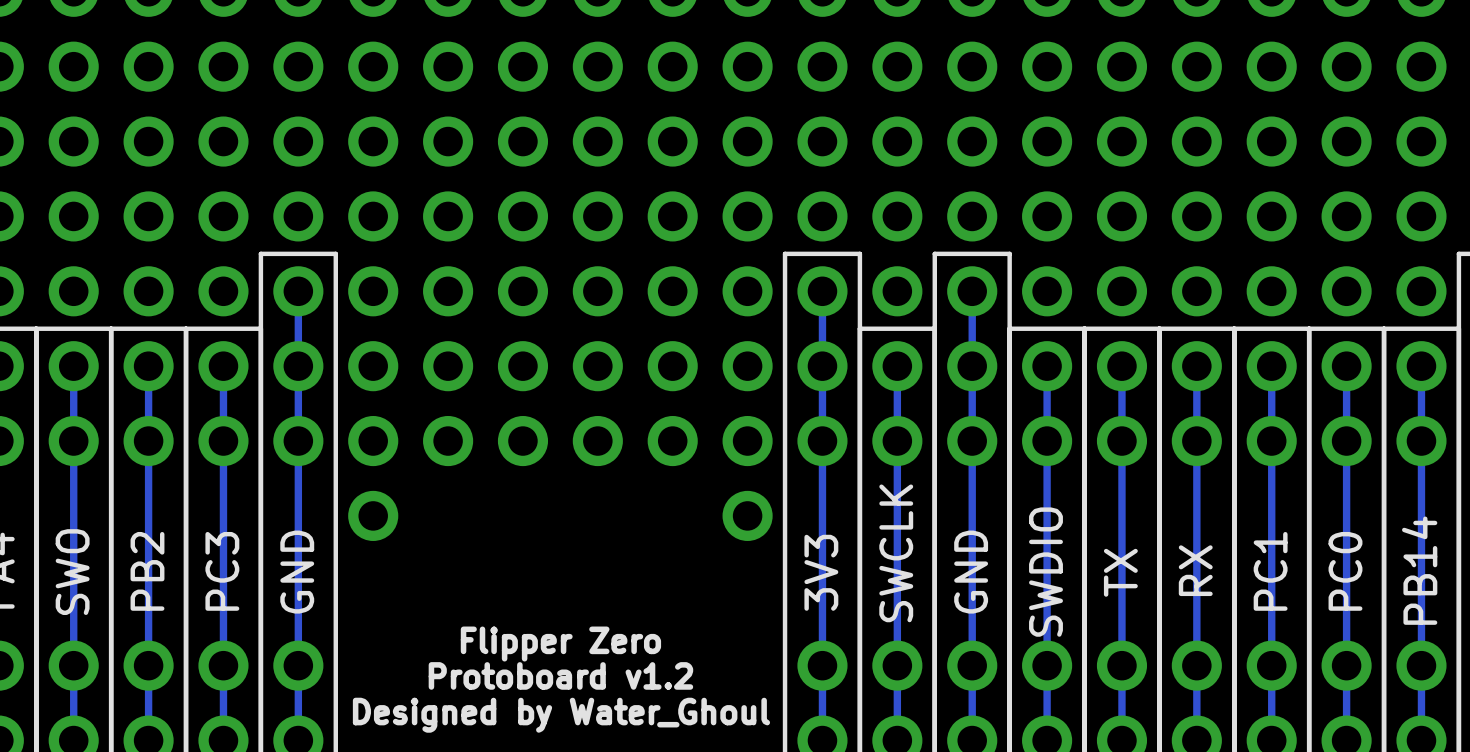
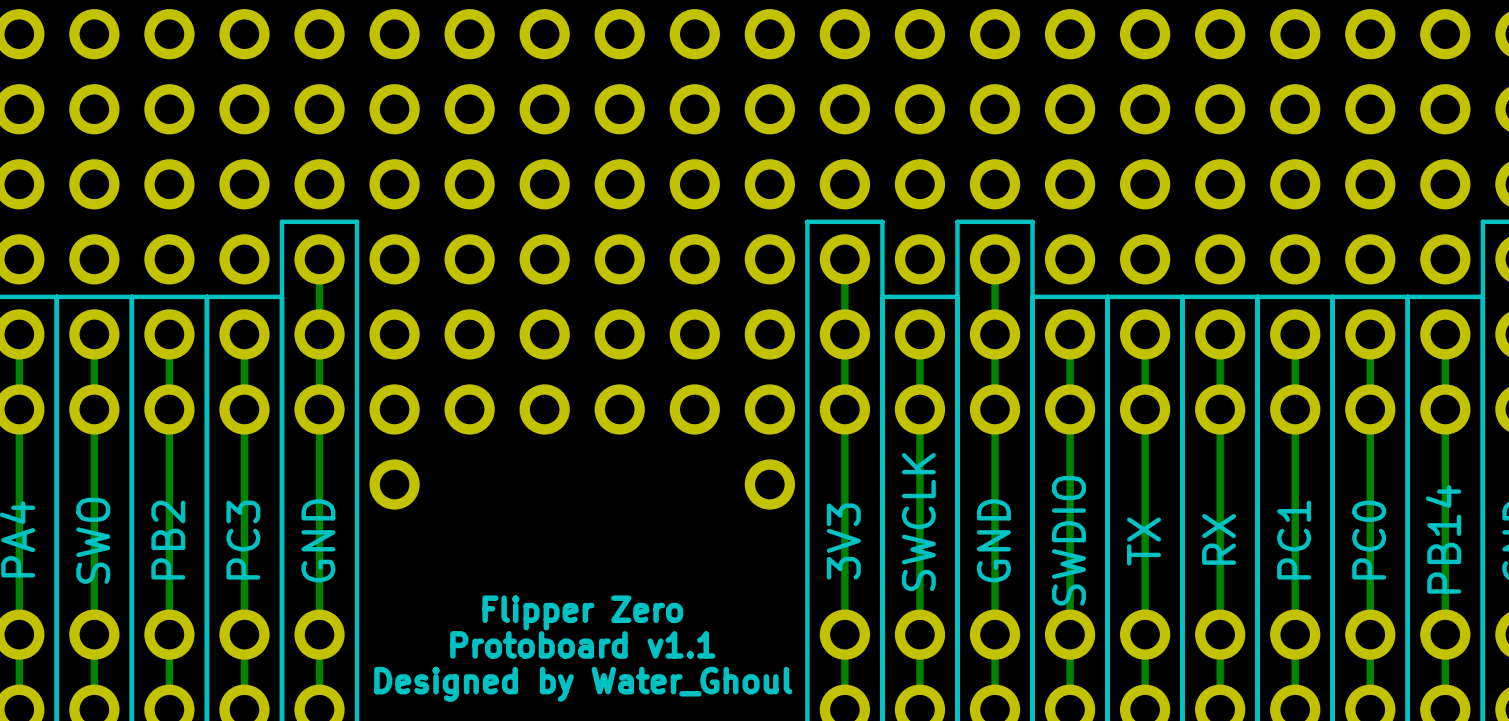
text: Protoboard v1.2 (560, 675) -> Protoboard v1.1 (582, 644)

